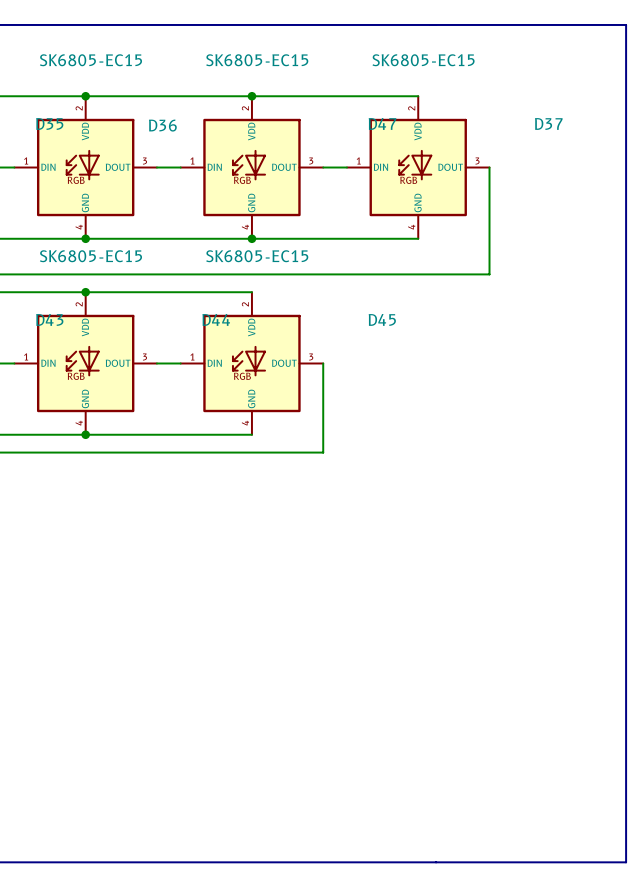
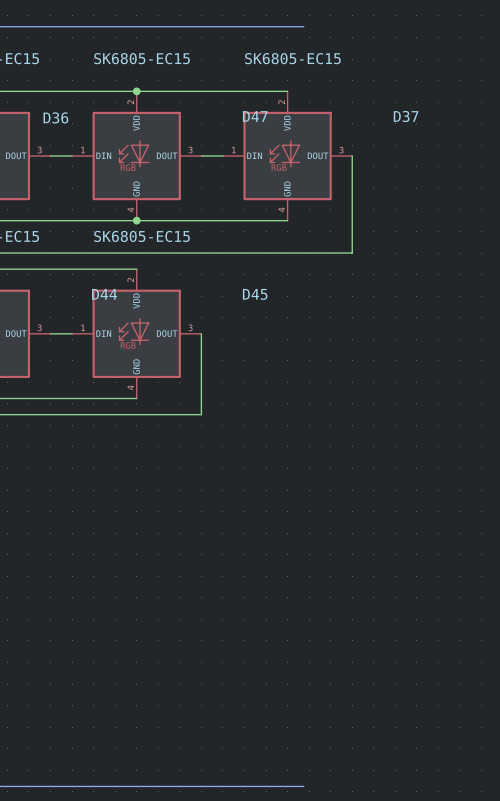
line: (436, 24) (626, 24) (626, 862) (436, 862) -> none

